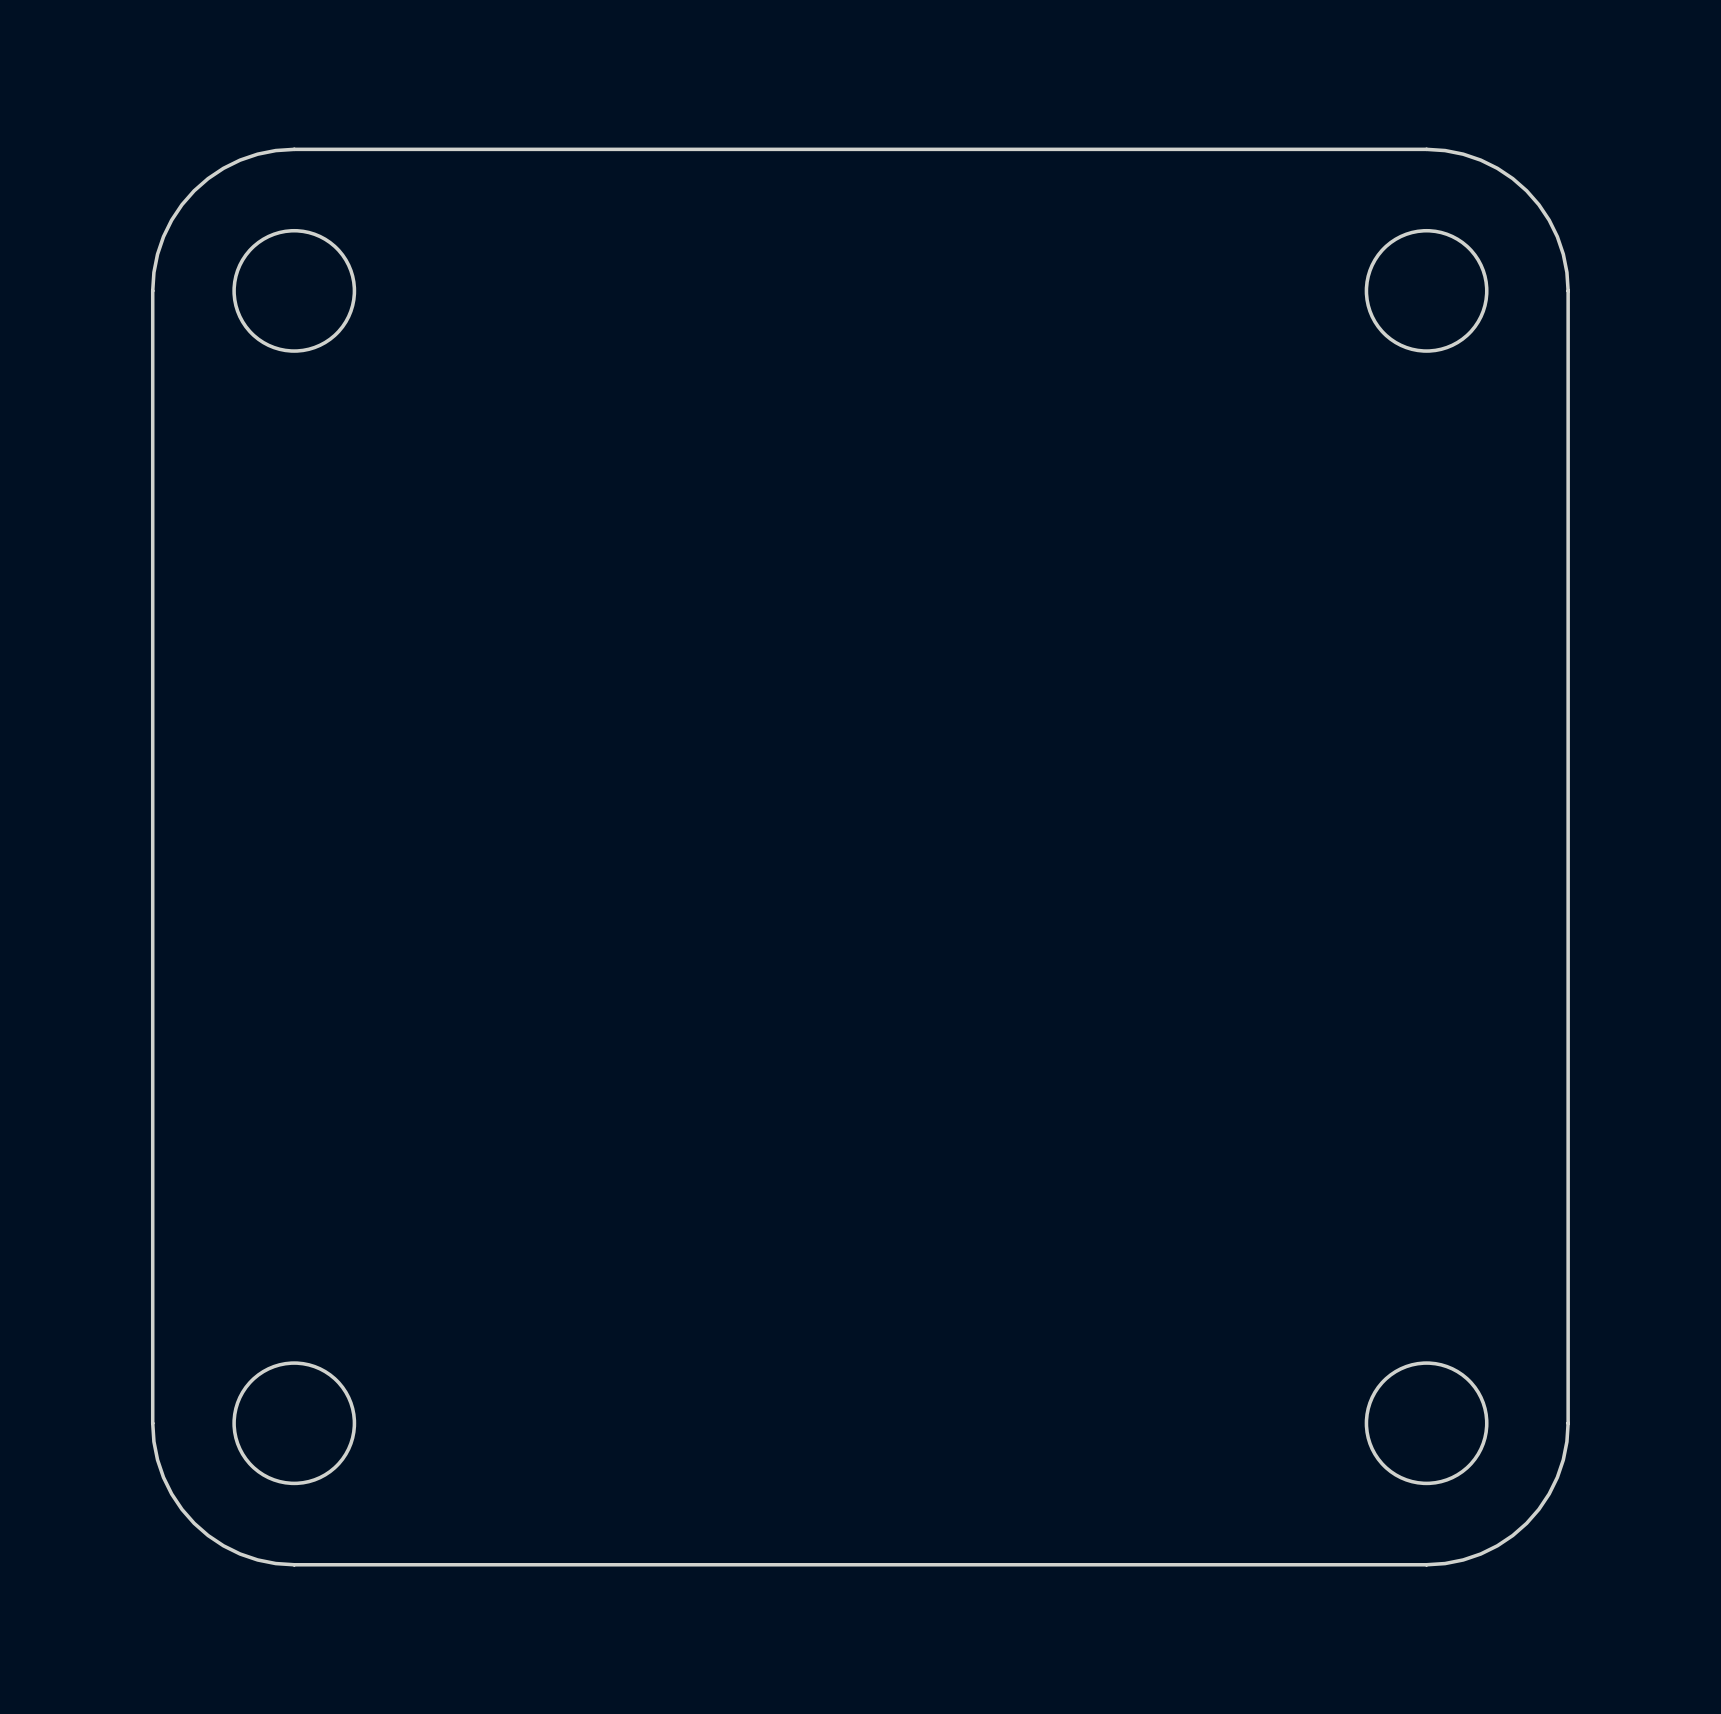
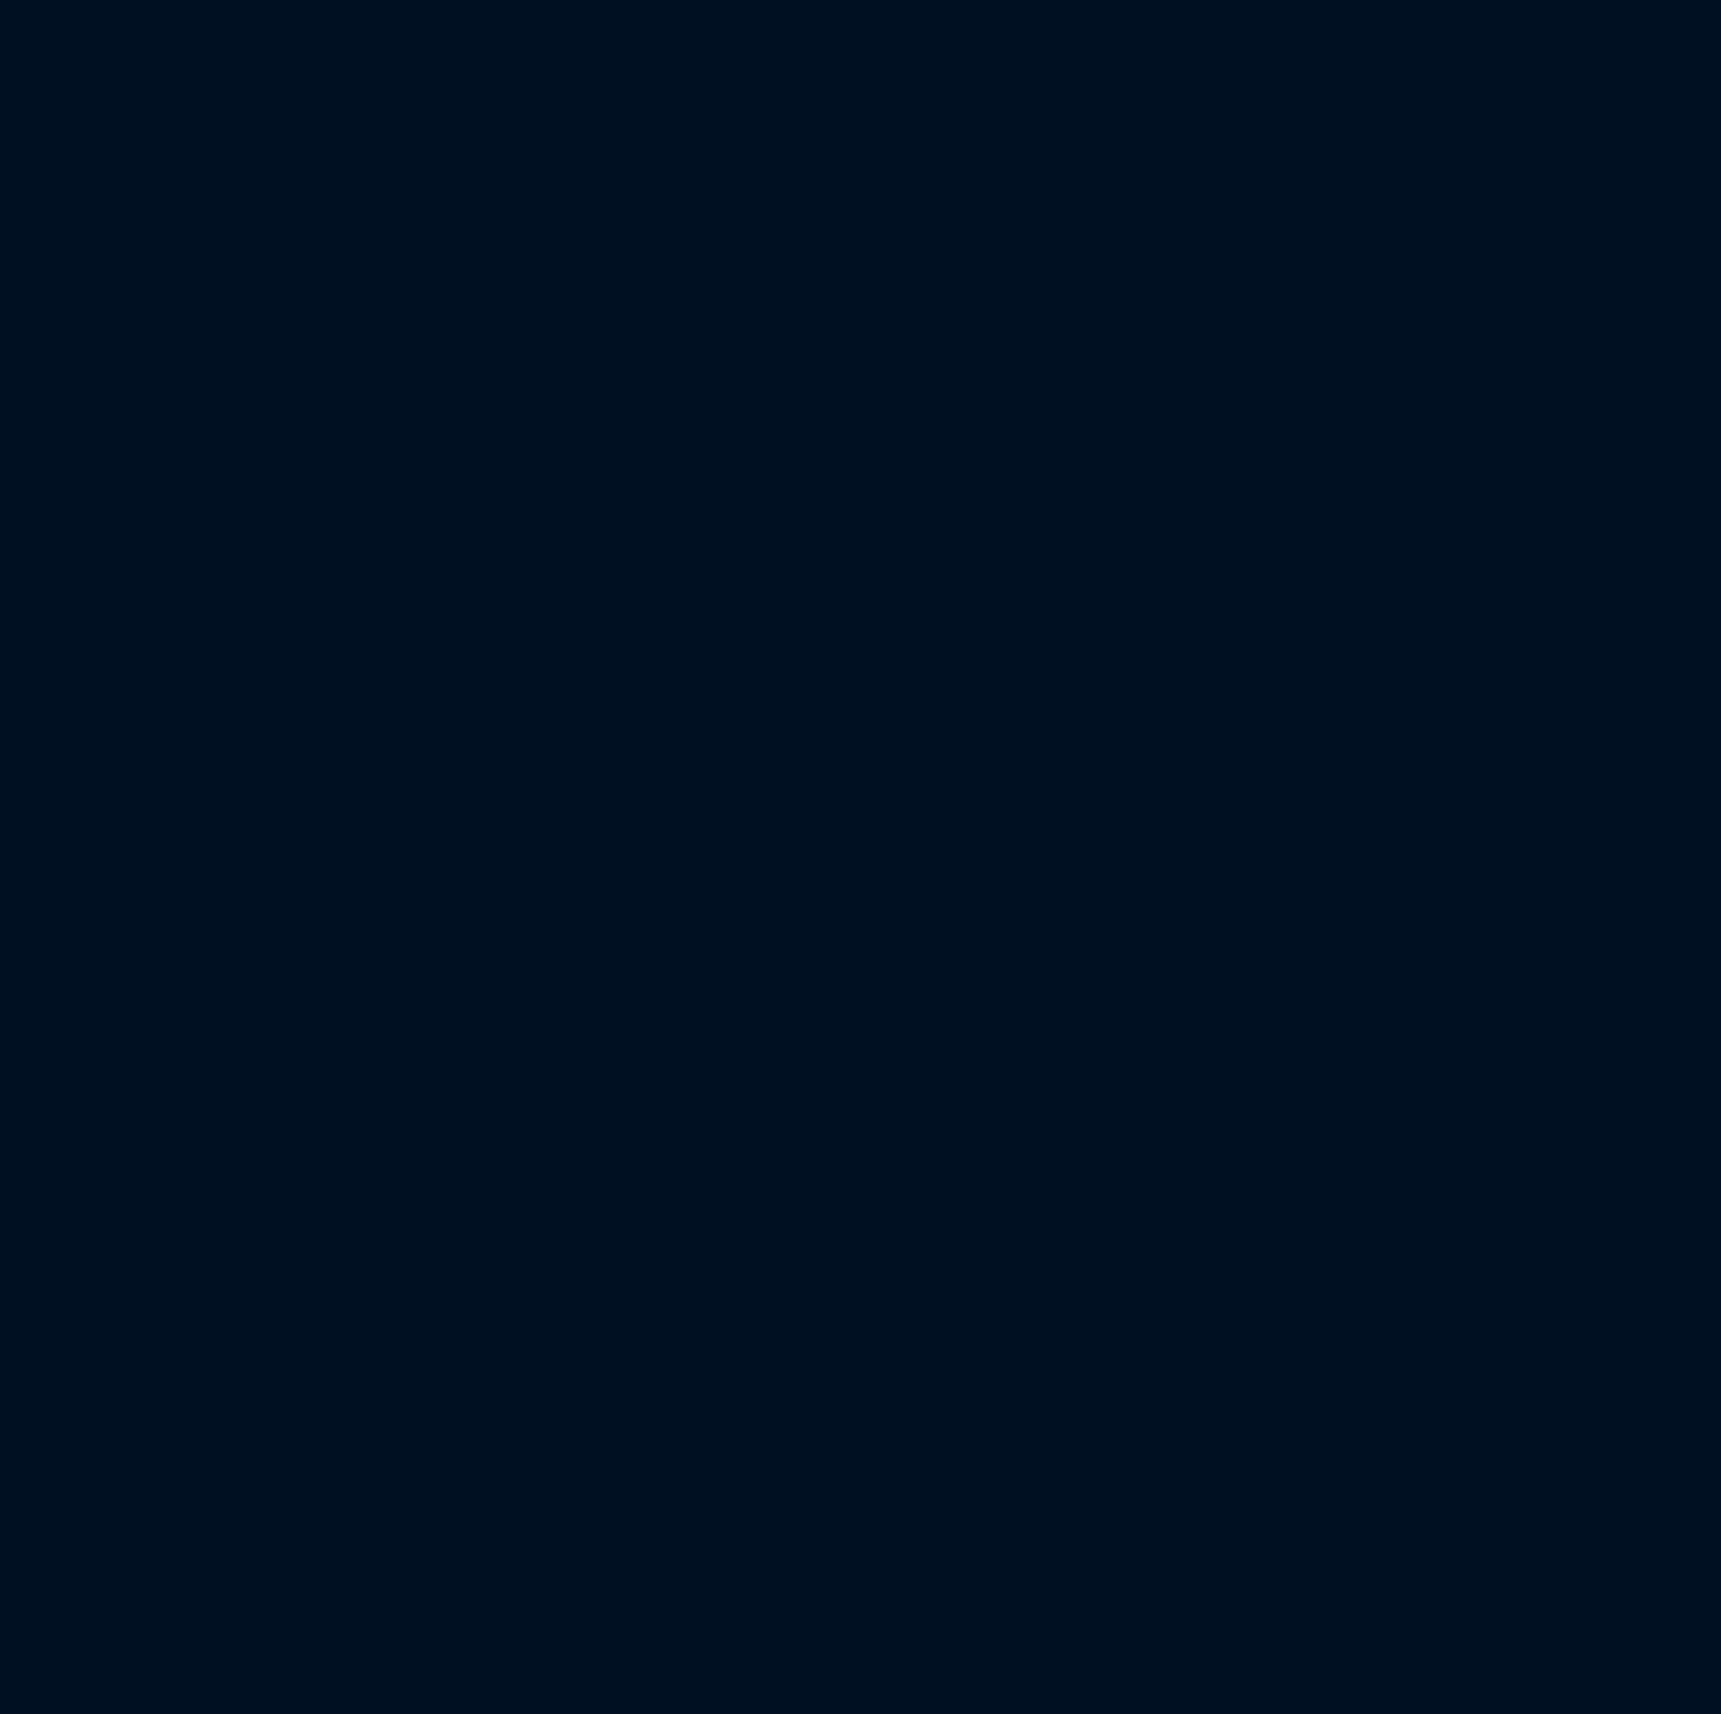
board edge: (1426, 149) (294, 149) (257, 154) (240, 160) (208, 178) (194, 190) (181, 204) (163, 236) (157, 254) (152, 290) (152, 1423) (153, 1441) (163, 1477) (181, 1509) (194, 1523) (208, 1535) (240, 1553) (257, 1559) (294, 1564) (1426, 1564) (1445, 1563) (1480, 1553) (1512, 1535) (1526, 1523) (1549, 1494) (1557, 1477) (1566, 1441) (1568, 1423) (1566, 272) (1557, 236) (1549, 220) (1526, 190) (1512, 178) (1480, 160) (1463, 154) (1426, 149) -> none
round board edge: [232, 228, 357, 353] -> none
round board edge: [1364, 228, 1489, 353] -> none
round board edge: [232, 1361, 357, 1486] -> none
round board edge: [1364, 1361, 1489, 1486] -> none

